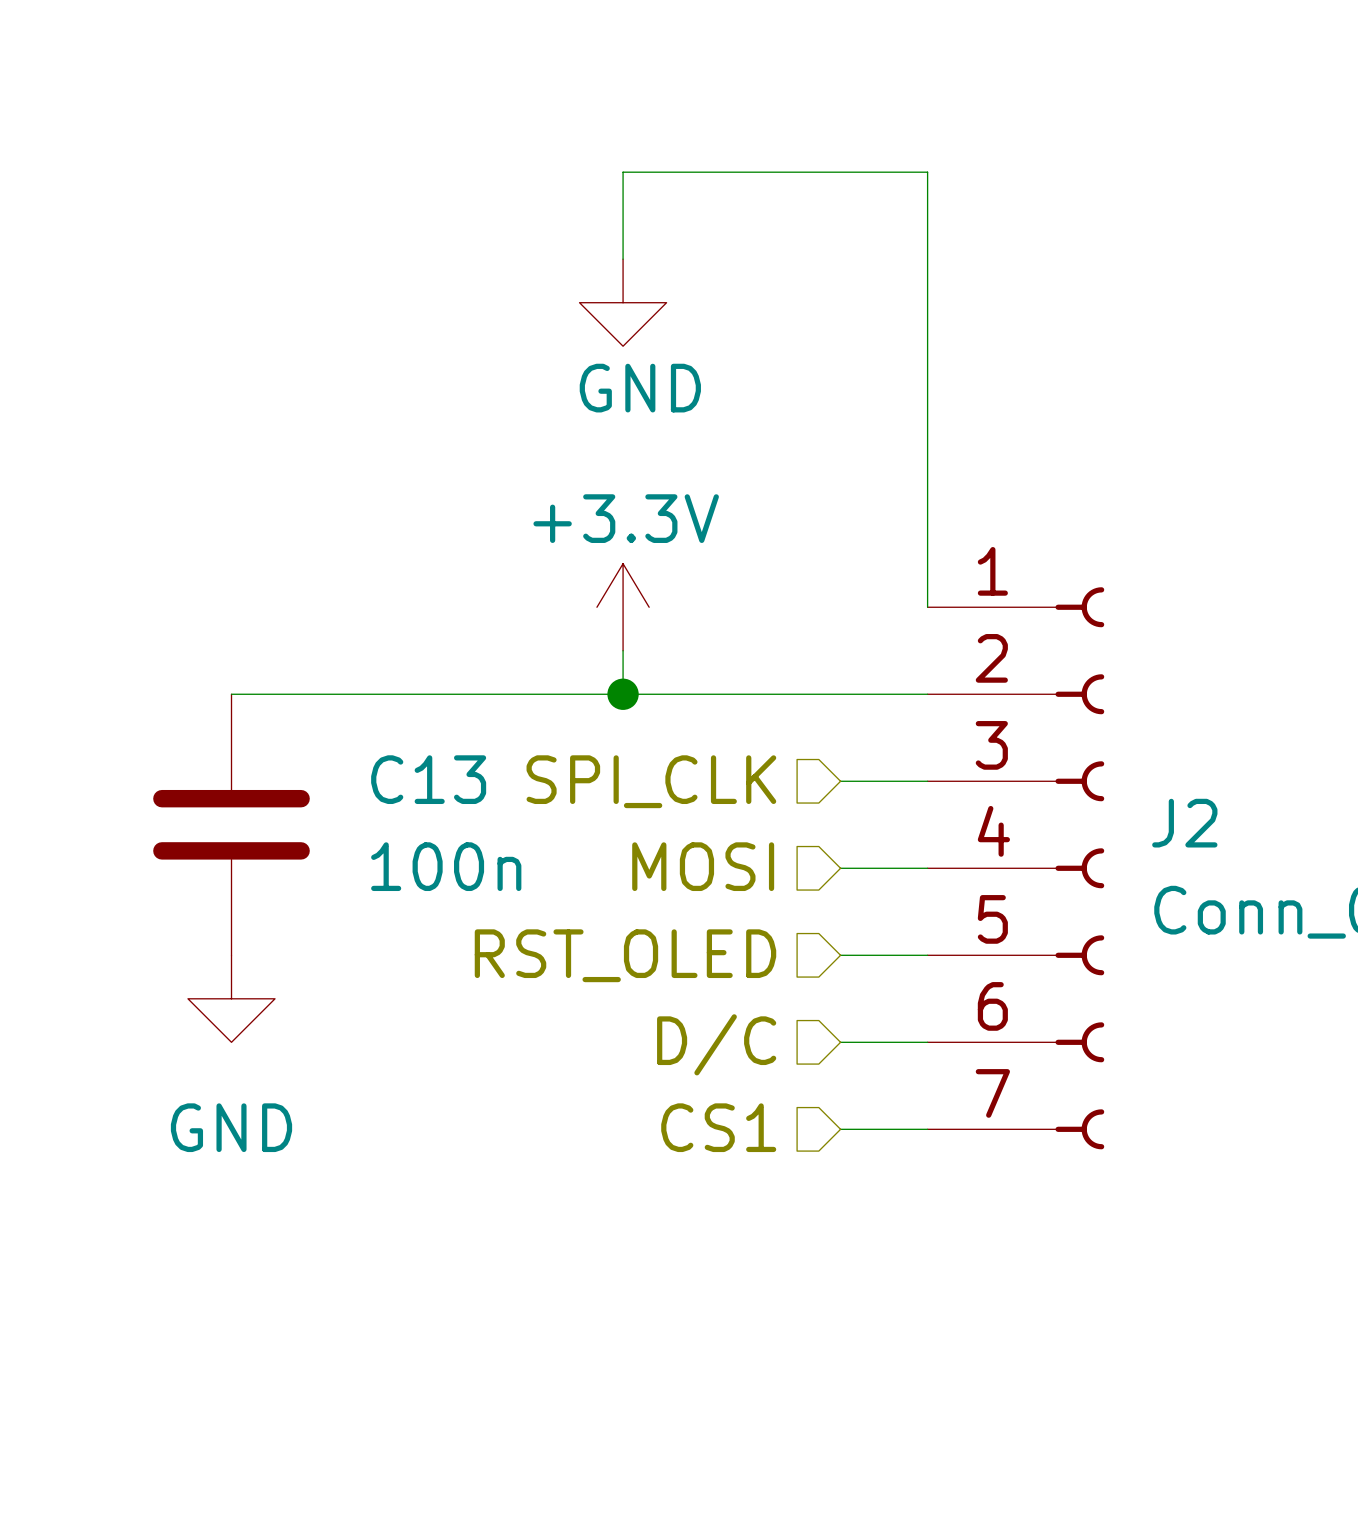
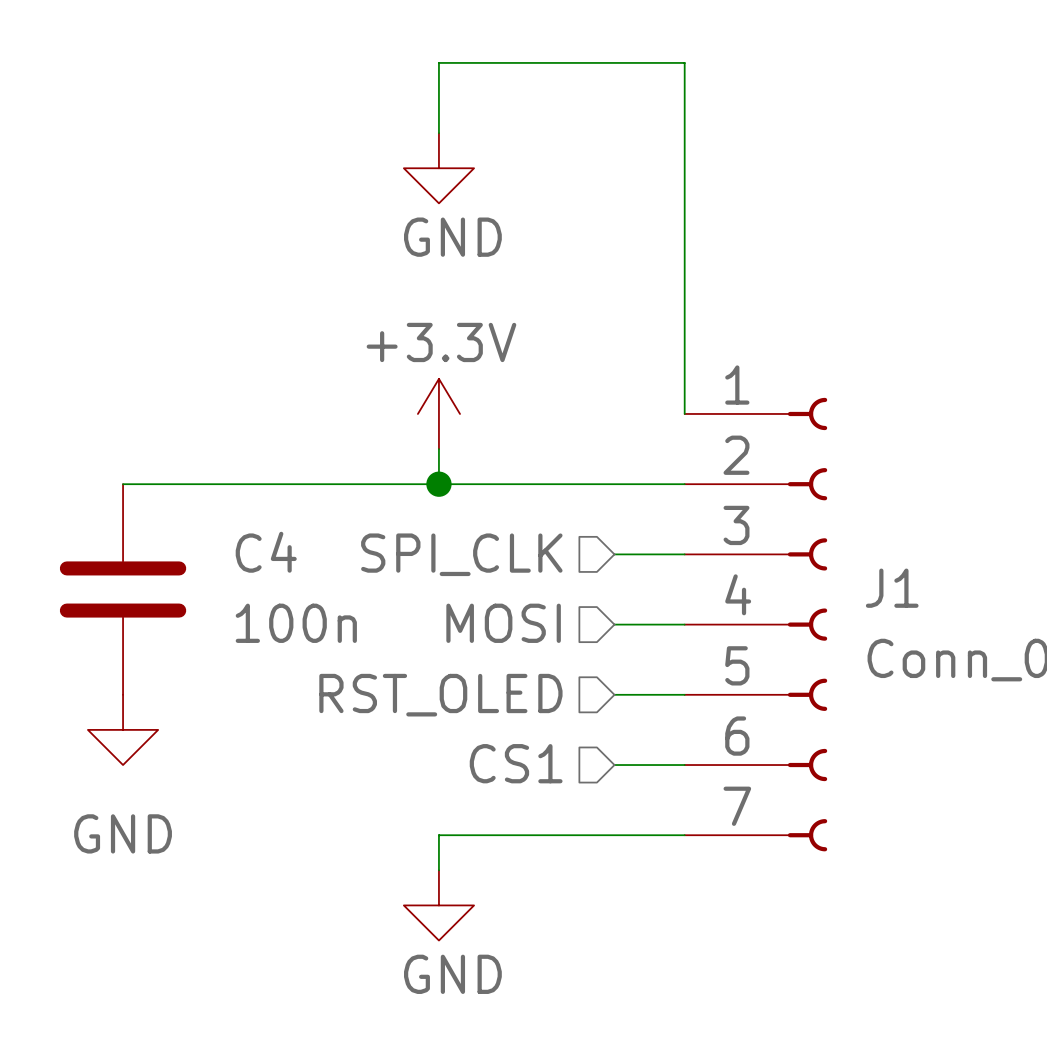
C13 name: C13 (428, 779) -> C4 (266, 552)
J2 name: J2 (1184, 823) -> J1 (892, 588)
hierarchical label: D/C (716, 1044) -> CS1 (516, 763)
hierarchical label: CS1 (718, 1127) -> none
wire: none -> (614, 835) (438, 835) (438, 870)
power symbol: none -> GND (438, 905)

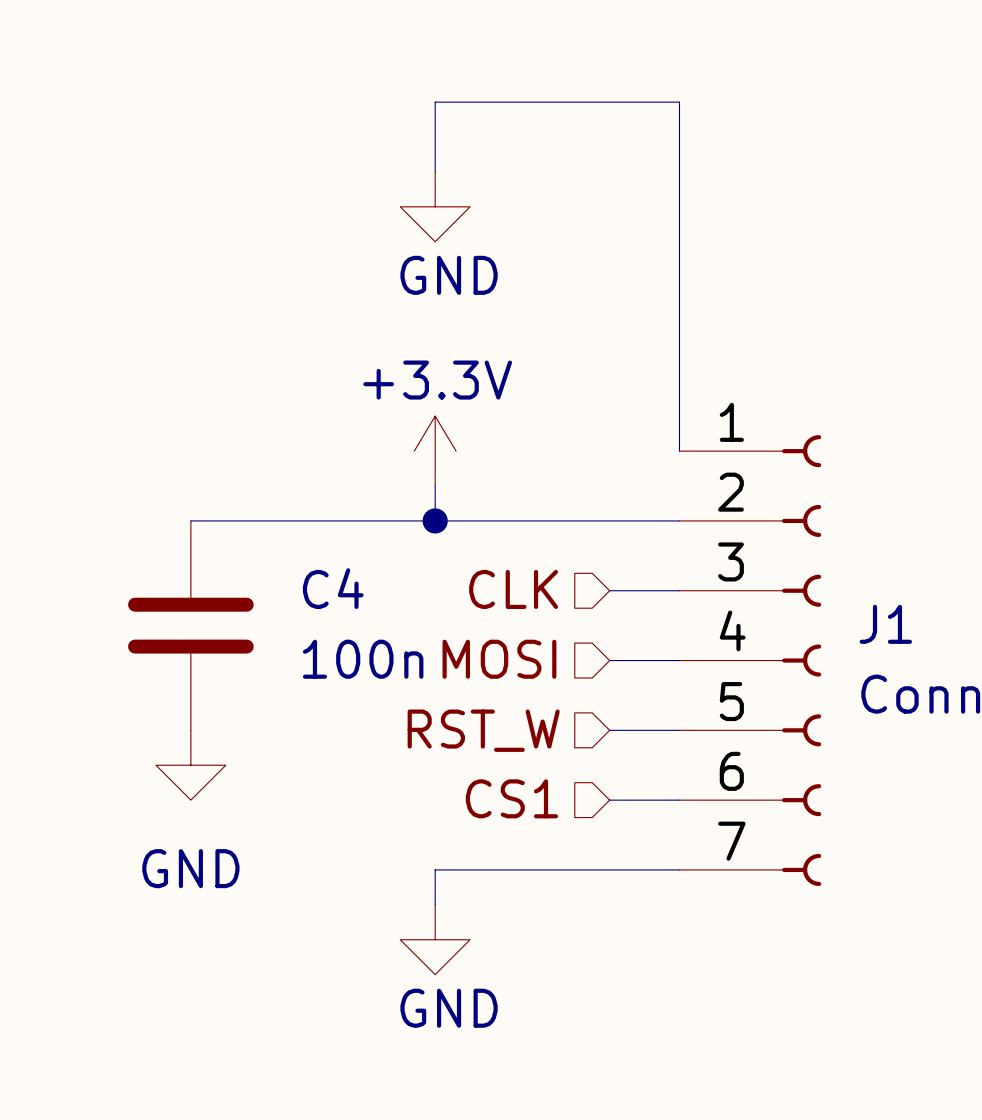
wire: (123, 484) (193, 484) -> none
hierarchical label: SPI_CLK (461, 554) -> CLK (513, 589)
C4 position: (123, 589) -> (190, 625)
hierarchical label: RST_OLED (440, 695) -> RST_W (483, 730)
power symbol position: GND (123, 729) -> GND (190, 765)

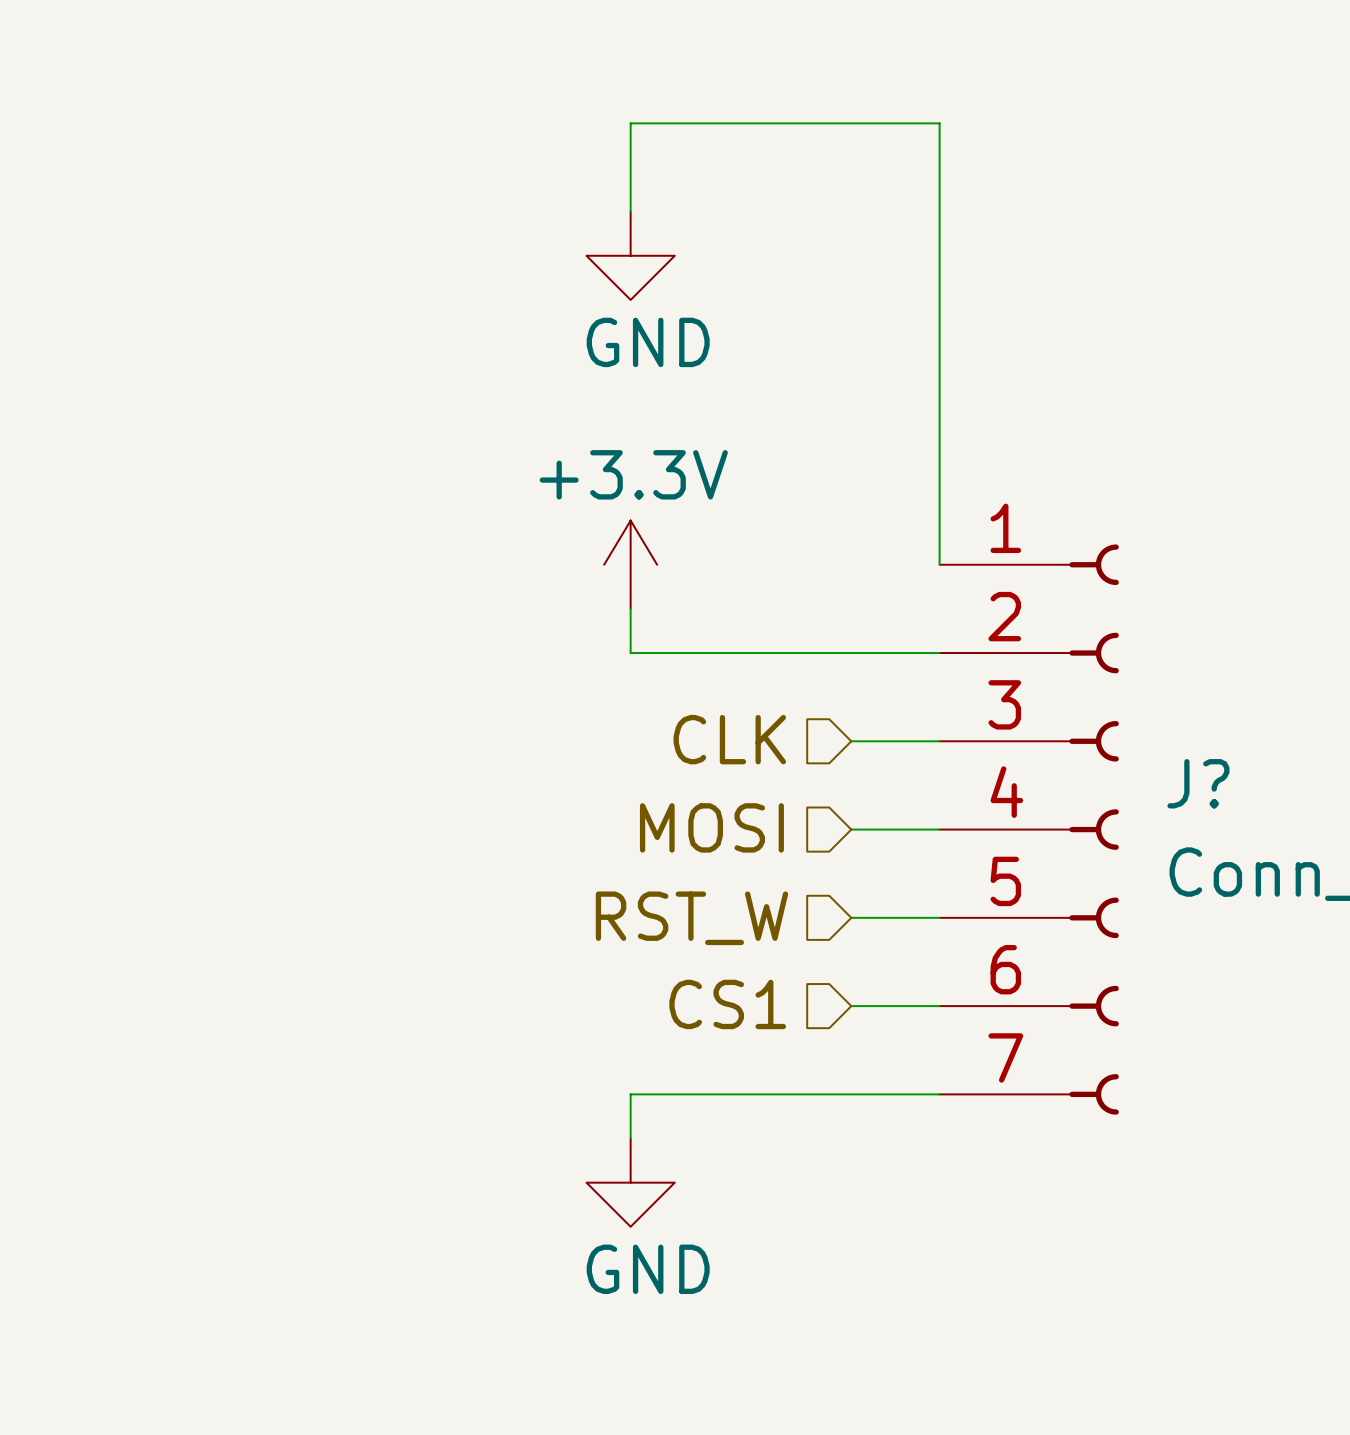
wire: (190, 520) (435, 520) -> none
junction: (435, 520) -> none
J1 name: J1 (885, 624) -> J? (1198, 783)
C4: 100n (190, 625) -> none
power symbol: GND (190, 765) -> none

